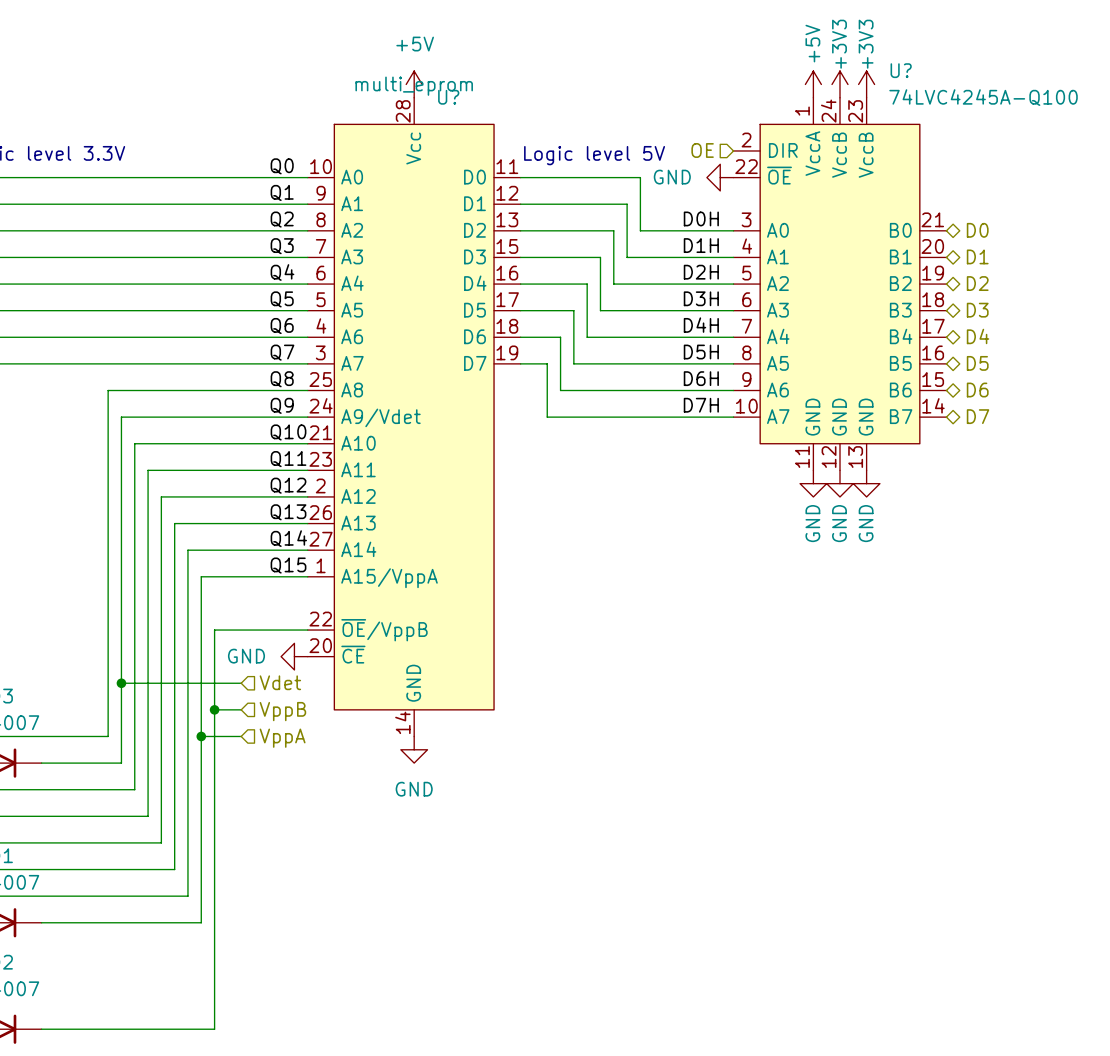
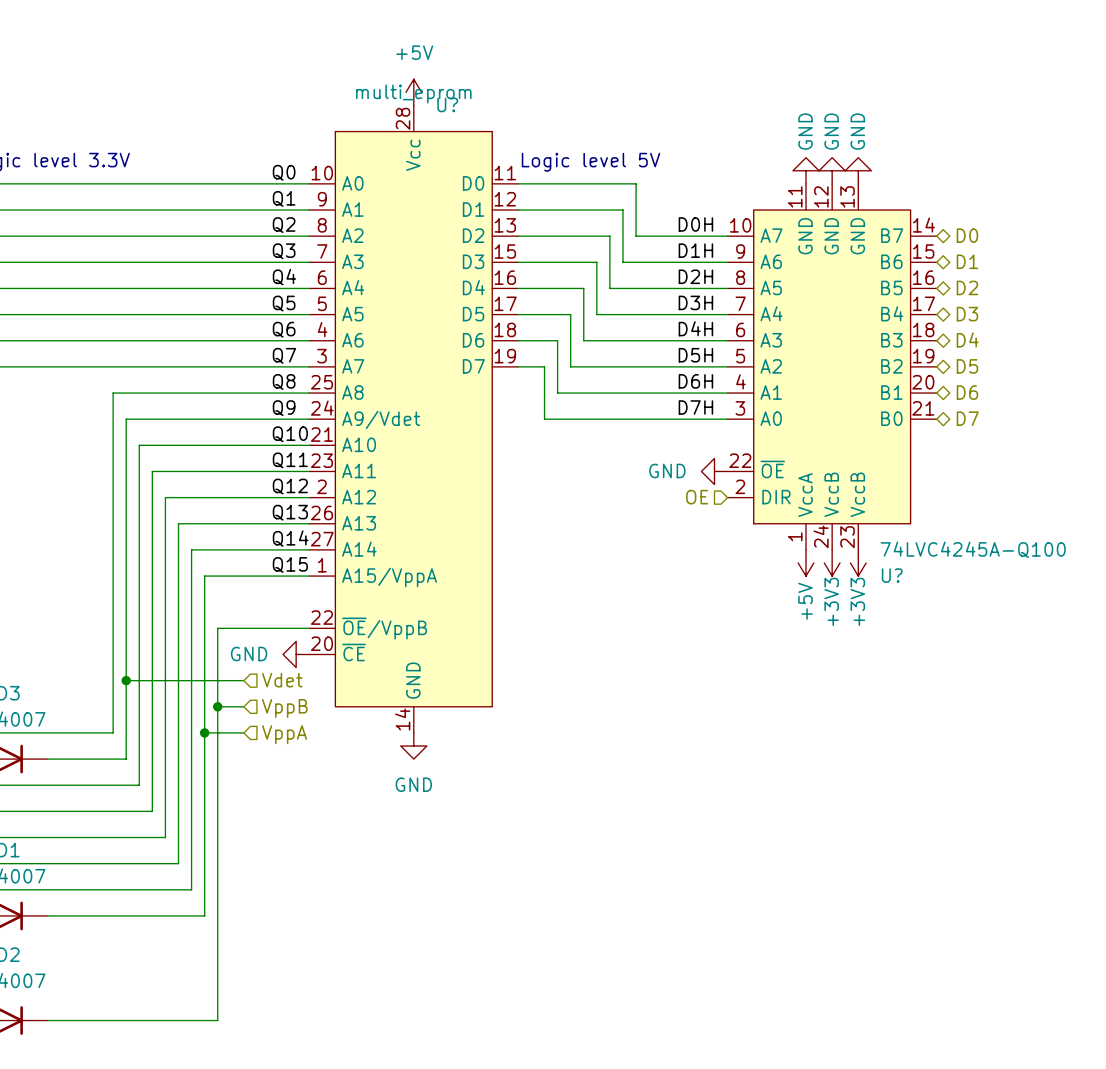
power symbol: +5V (813, 84) -> none
power symbol: +3V3 (840, 84) -> none
power symbol: +3V3 (866, 84) -> none
hierarchical label: OE (702, 150) -> none
power symbol: none -> GND (806, 170)
power symbol: none -> GND (832, 170)
power symbol: none -> GND (858, 170)
power symbol: GND (720, 177) -> none
U?: 74LVC4245A-Q100 (840, 284) -> none
U?: none -> 74LVC4245A-Q100 (832, 366)
power symbol: none -> GND (714, 471)
power symbol: GND (813, 483) -> none
power symbol: GND (840, 483) -> none
power symbol: GND (866, 483) -> none
hierarchical label: none -> OE (697, 497)
power symbol: none -> +5V (806, 562)
power symbol: none -> +3V3 (832, 562)
power symbol: none -> +3V3 (858, 562)

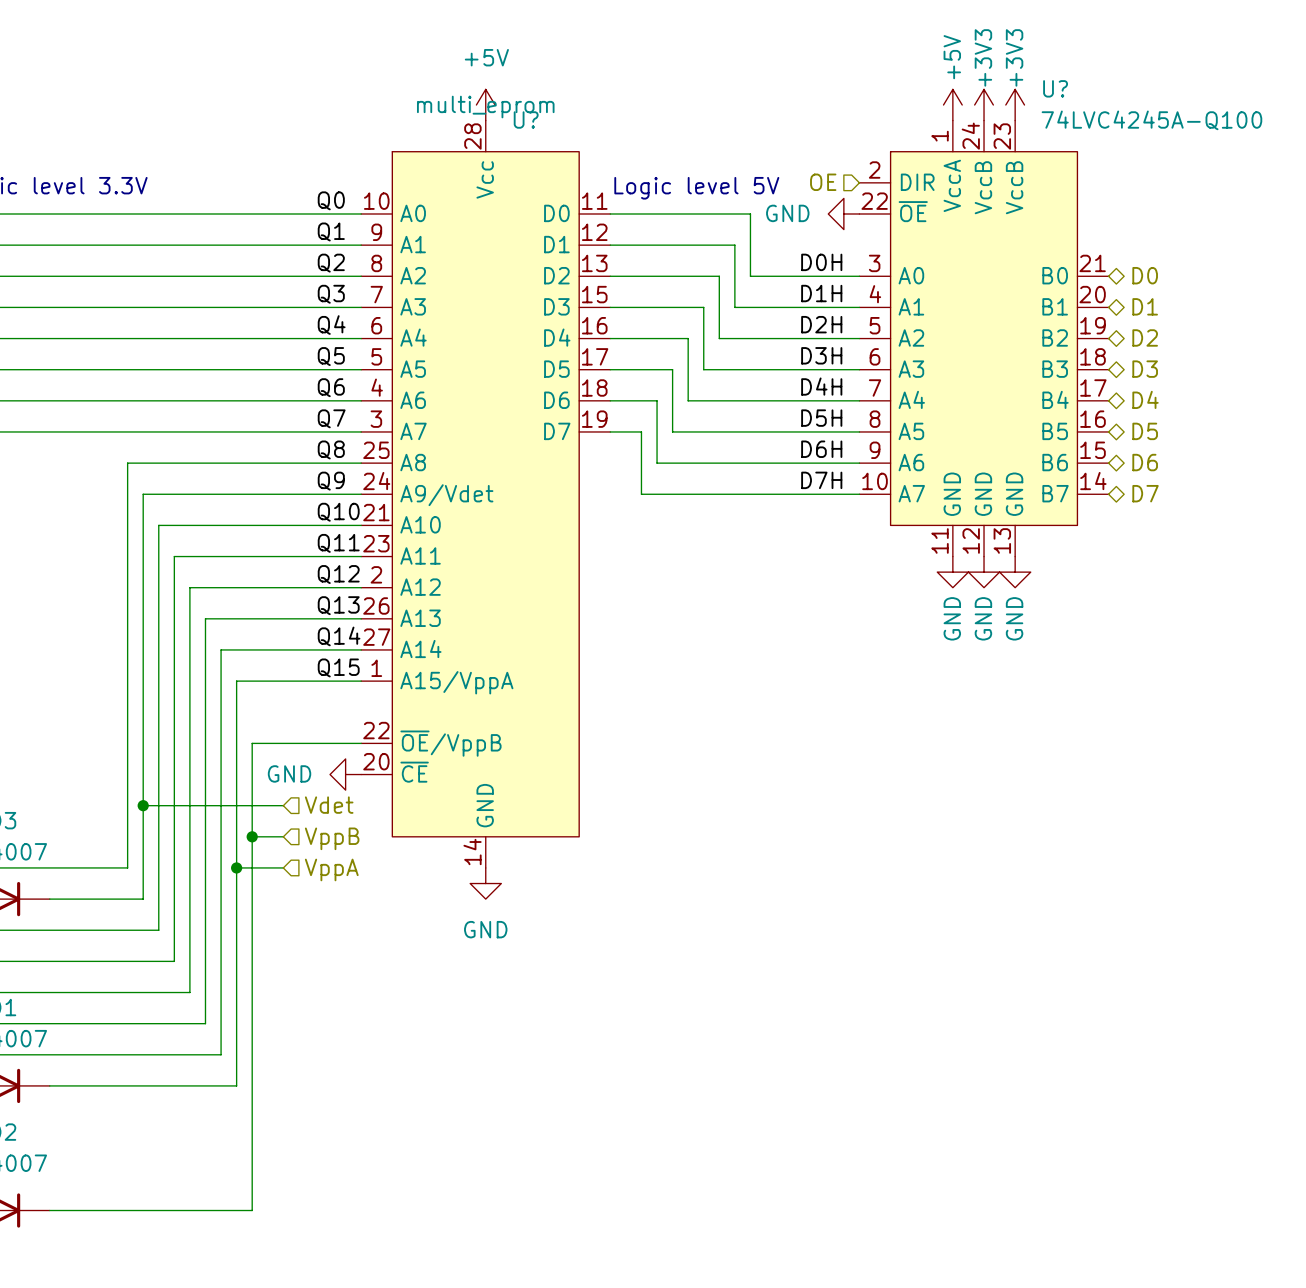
power symbol: none -> +5V (952, 105)
power symbol: none -> +3V3 (984, 105)
power symbol: none -> +3V3 (1015, 105)
hierarchical label: none -> OE (823, 182)
power symbol: GND (806, 170) -> none
power symbol: GND (832, 170) -> none
power symbol: GND (858, 170) -> none
power symbol: none -> GND (843, 213)
U?: none -> 74LVC4245A-Q100 (984, 338)
U?: 74LVC4245A-Q100 (832, 366) -> none
power symbol: GND (714, 471) -> none
power symbol: none -> GND (952, 572)
power symbol: none -> GND (984, 572)
power symbol: none -> GND (1015, 572)
hierarchical label: OE (697, 497) -> none
power symbol: +5V (806, 562) -> none
power symbol: +3V3 (832, 562) -> none
power symbol: +3V3 (858, 562) -> none

